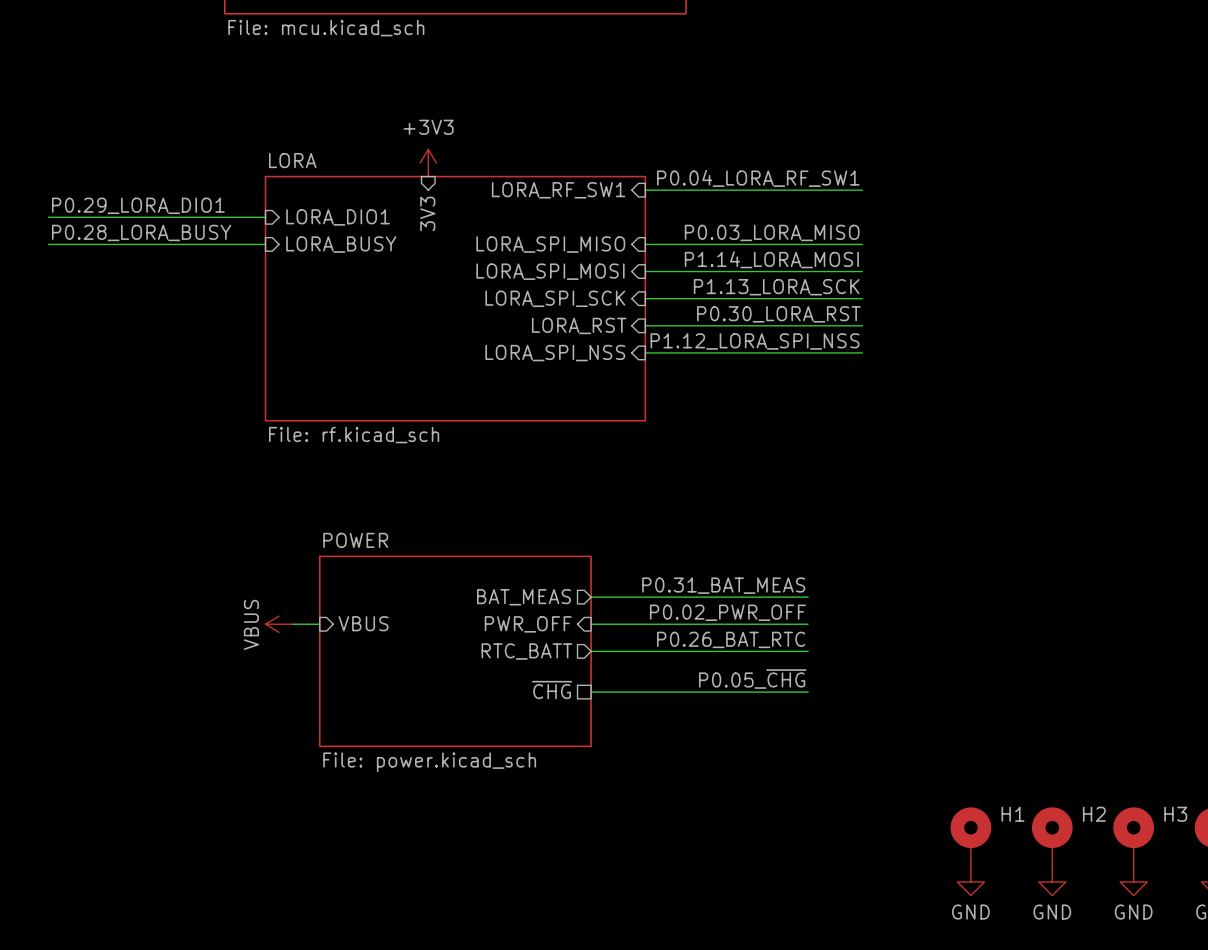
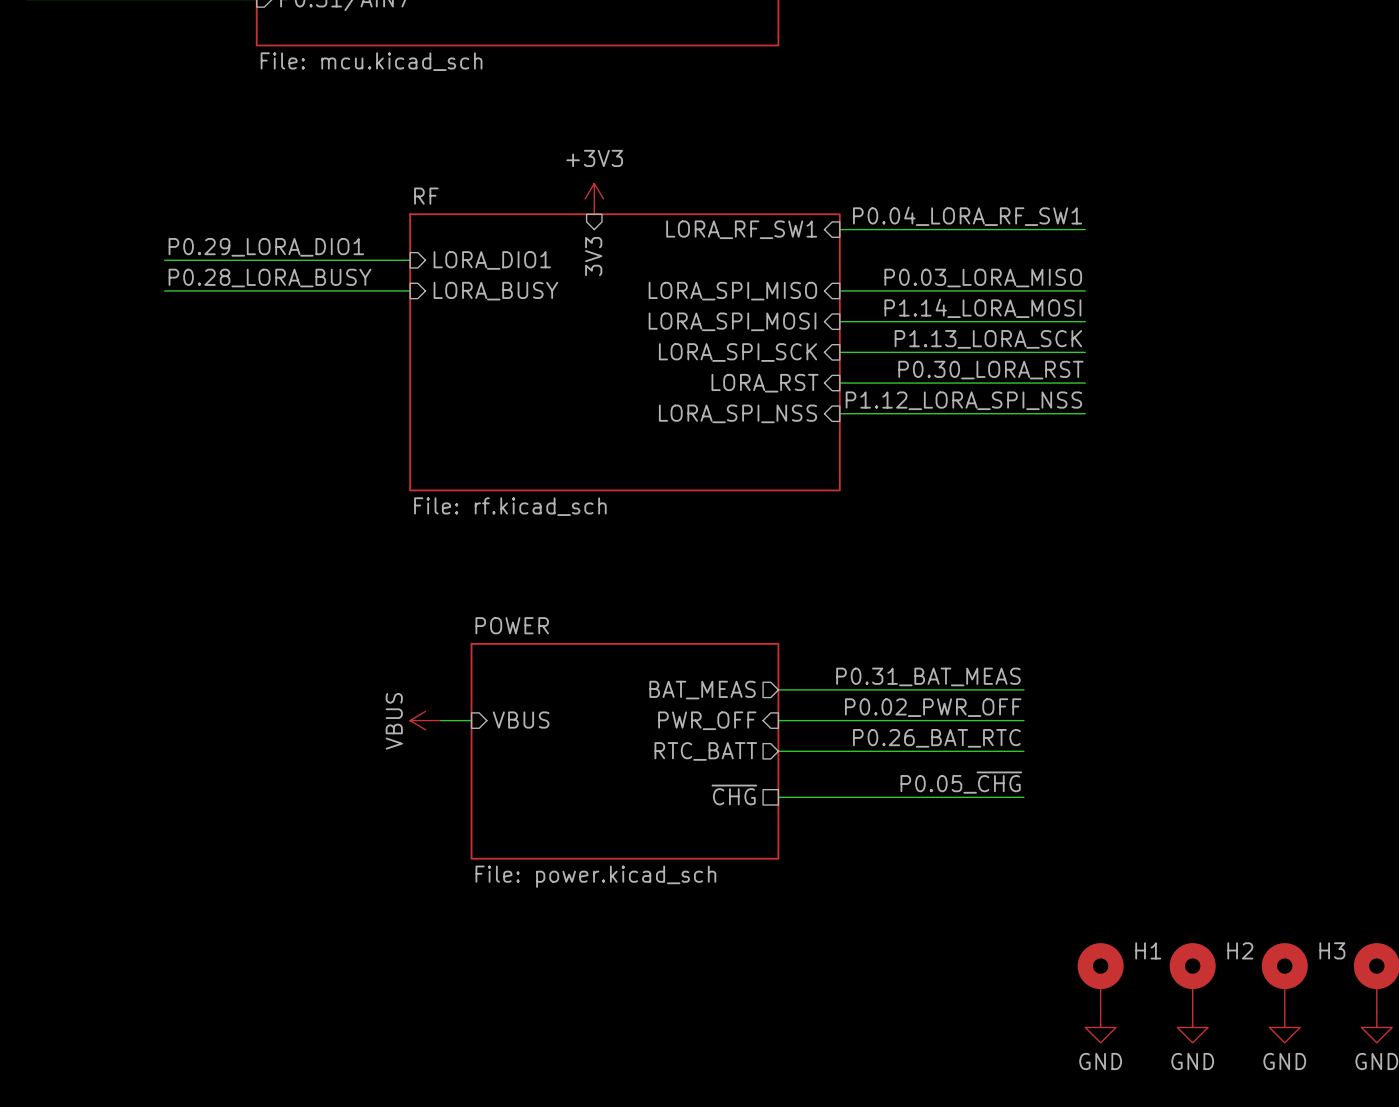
power symbol position: +3V3 (428, 163) -> +3V3 (594, 198)
label position: P0.04_LORA_RF_SW1 (758, 178) -> P0.04_LORA_RF_SW1 (967, 216)
sheet pin position: LORA_RF_SW1 (558, 190) -> LORA_RF_SW1 (741, 229)
wire: (645, 190) (862, 190) -> (839, 229) (1085, 229)
label position: P0.29_LORA_DIO1 (138, 205) -> P0.29_LORA_DIO1 (266, 247)
sheet pin position: 3V3 (427, 213) -> 3V3 (593, 256)
wire: (48, 217) (265, 217) -> (164, 260) (410, 260)
sheet pin position: LORA_DIO1 (338, 217) -> LORA_DIO1 (492, 260)
label position: P0.28_LORA_BUSY (141, 232) -> P0.28_LORA_BUSY (269, 278)
label position: P0.03_LORA_MISO (772, 232) -> P0.03_LORA_MISO (983, 278)
wire: (48, 244) (265, 244) -> (164, 290) (410, 290)
sheet pin position: LORA_BUSY (341, 244) -> LORA_BUSY (495, 291)
sheet pin position: LORA_SPI_MISO (550, 244) -> LORA_SPI_MISO (732, 291)
wire: (645, 244) (862, 244) -> (839, 290) (1085, 290)
label position: P1.14_LORA_MOSI (771, 259) -> P1.14_LORA_MOSI (982, 308)
sheet pin position: LORA_SPI_MOSI (550, 271) -> LORA_SPI_MOSI (732, 321)
wire: (645, 271) (862, 271) -> (839, 321) (1085, 321)
sheet RF: none -> File: rf.kicad_sch (624, 352)
label position: P1.13_LORA_SCK (776, 287) -> P1.13_LORA_SCK (988, 339)
sheet LORA: File: rf.kicad_sch (455, 298) -> none
sheet pin position: LORA_SPI_SCK (555, 298) -> LORA_SPI_SCK (737, 352)
wire: (645, 298) (862, 298) -> (839, 352) (1085, 352)
label position: P0.30_LORA_RST (778, 314) -> P0.30_LORA_RST (990, 370)
sheet pin position: LORA_RST (579, 325) -> LORA_RST (765, 383)
wire: (645, 325) (862, 325) -> (839, 383) (1085, 383)
label position: P1.12_LORA_SPI_NSS (755, 341) -> P1.12_LORA_SPI_NSS (963, 400)
wire: (645, 352) (862, 352) -> (839, 413) (1085, 413)
sheet pin position: LORA_SPI_NSS (555, 353) -> LORA_SPI_NSS (737, 413)
label position: P0.31_BAT_MEAS (723, 585) -> P0.31_BAT_MEAS (928, 676)
sheet pin position: BAT_MEAS (524, 597) -> BAT_MEAS (702, 690)
wire: (591, 597) (808, 597) -> (778, 689) (1023, 689)
label position: P0.02_PWR_OFF (727, 612) -> P0.02_PWR_OFF (933, 707)
sheet pin position: VBUS (363, 623) -> VBUS (521, 720)
power symbol position: VBUS (279, 624) -> VBUS (425, 720)
wire: (292, 624) (319, 624) -> (440, 720) (471, 720)
sheet pin position: PWR_OFF (528, 624) -> PWR_OFF (707, 720)
wire: (591, 624) (808, 624) -> (778, 720) (1023, 720)
label position: P0.26_BAT_RTC (731, 639) -> P0.26_BAT_RTC (936, 738)
sheet POWER position: (455, 651) -> (624, 751)
sheet pin position: RTC_BATT (526, 651) -> RTC_BATT (705, 751)
wire: (591, 651) (808, 651) -> (778, 751) (1023, 751)
label position: P0.05_~{CHG} (752, 679) -> P0.05_~{CHG} (961, 782)
sheet pin position: ~{CHG} (552, 690) -> ~{CHG} (734, 794)
wire: (591, 692) (808, 692) -> (778, 797) (1023, 797)

